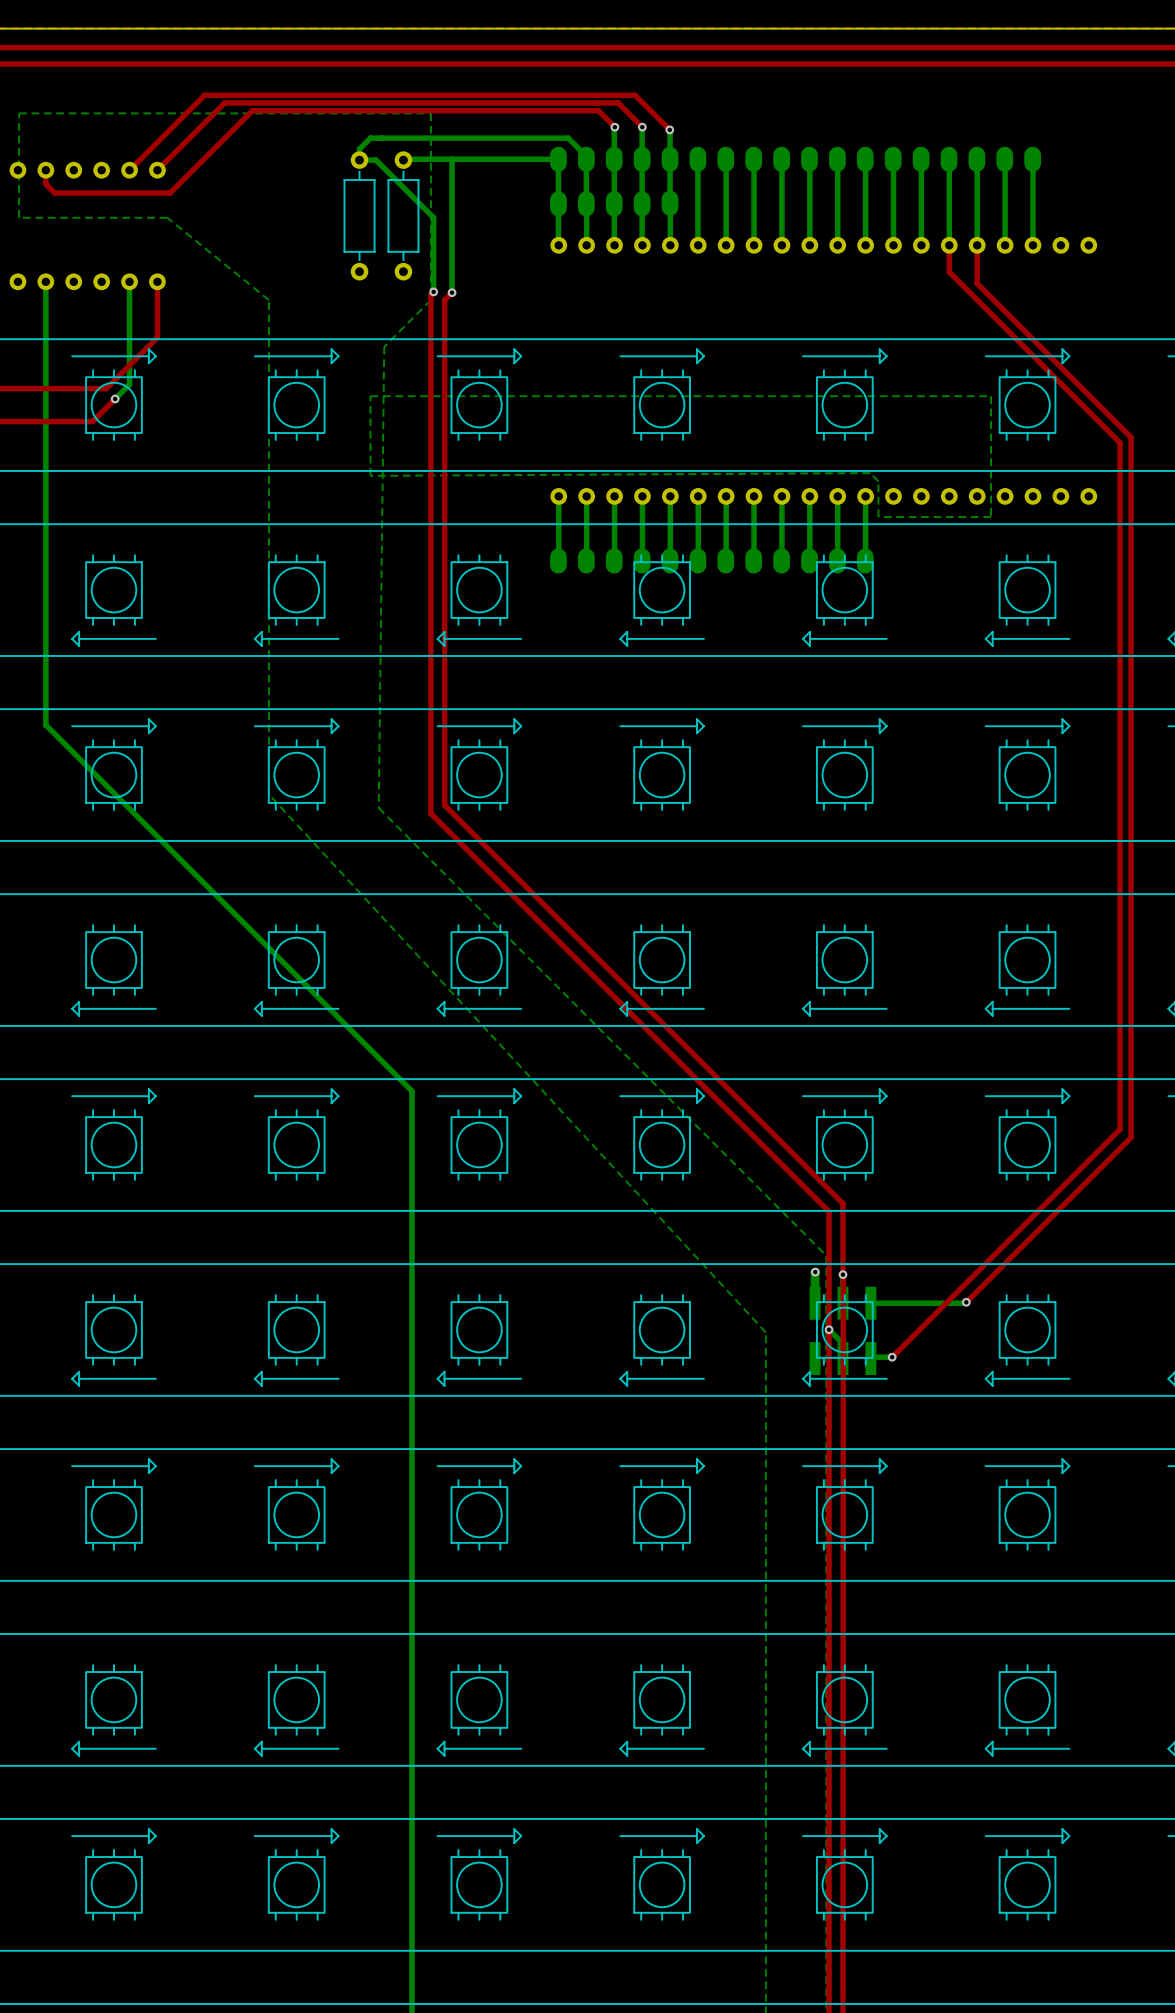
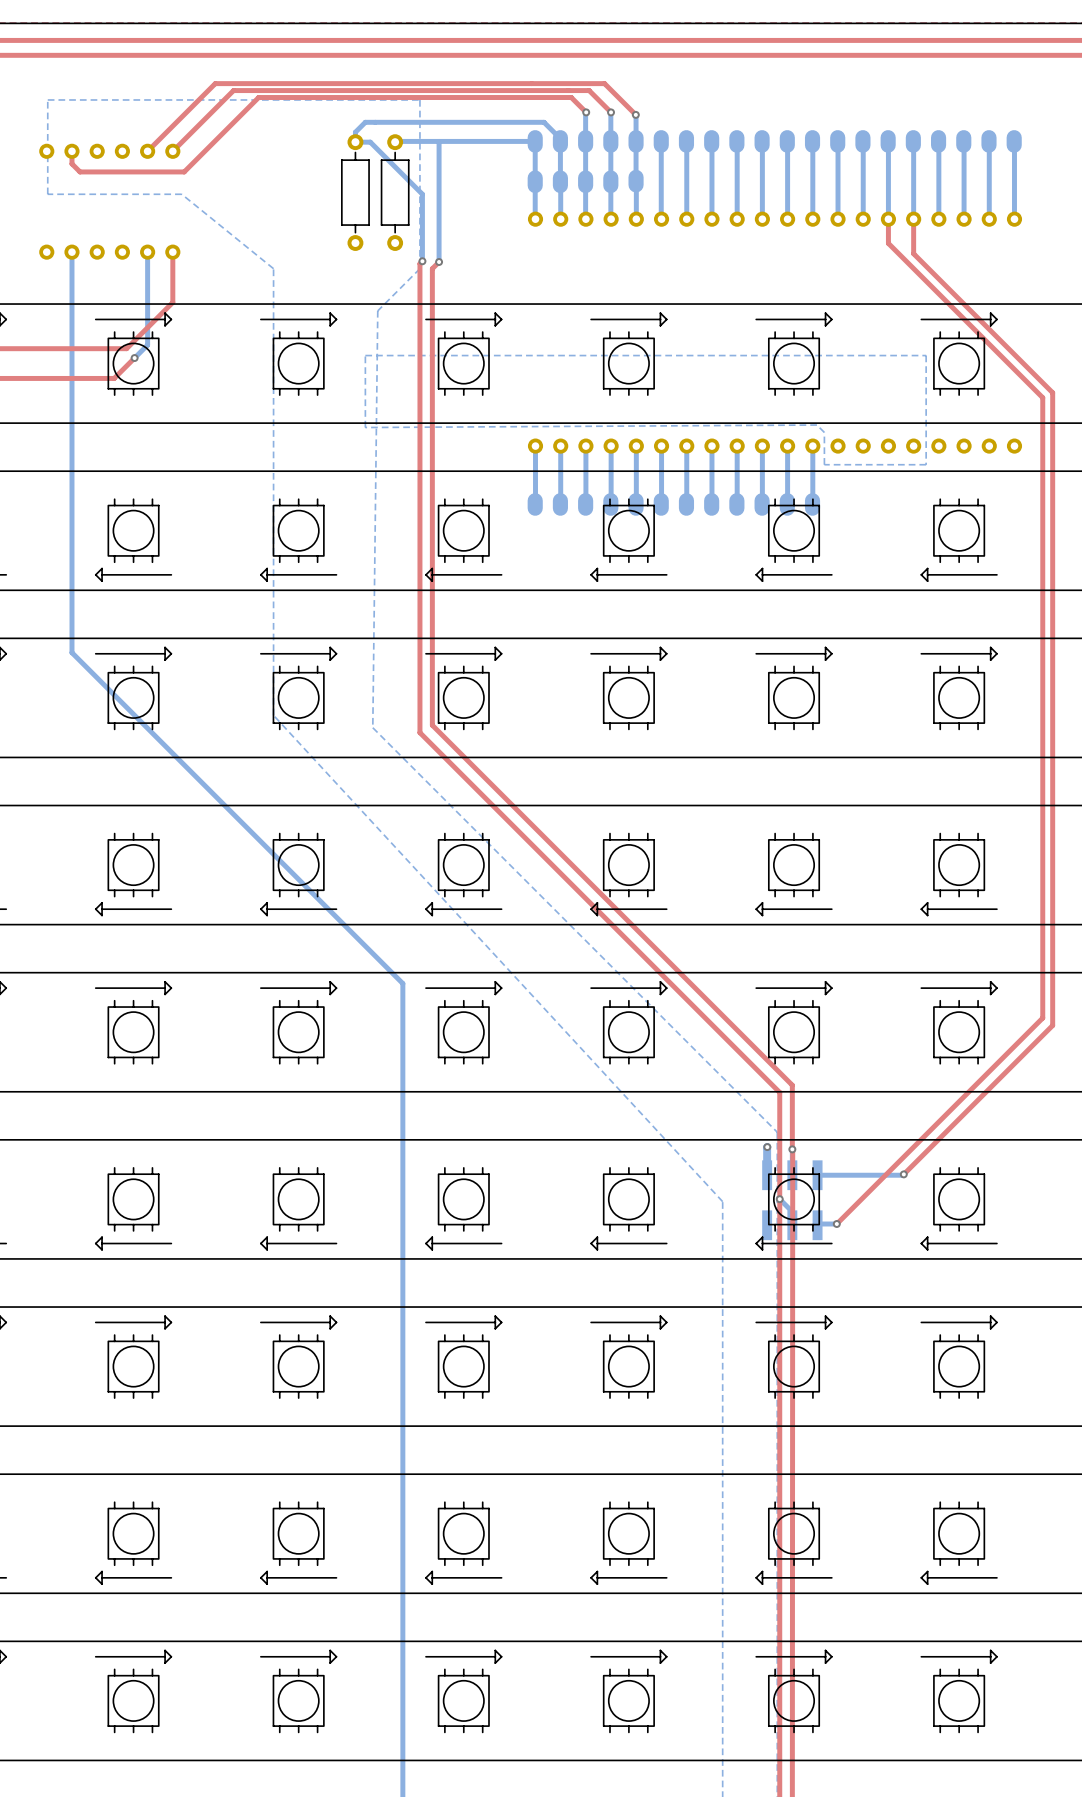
bottom track: none -> (988, 141) (989, 219)
part: none -> (988, 141)
bottom track: none -> (1014, 141) (1014, 219)
part: none -> (1014, 141)

